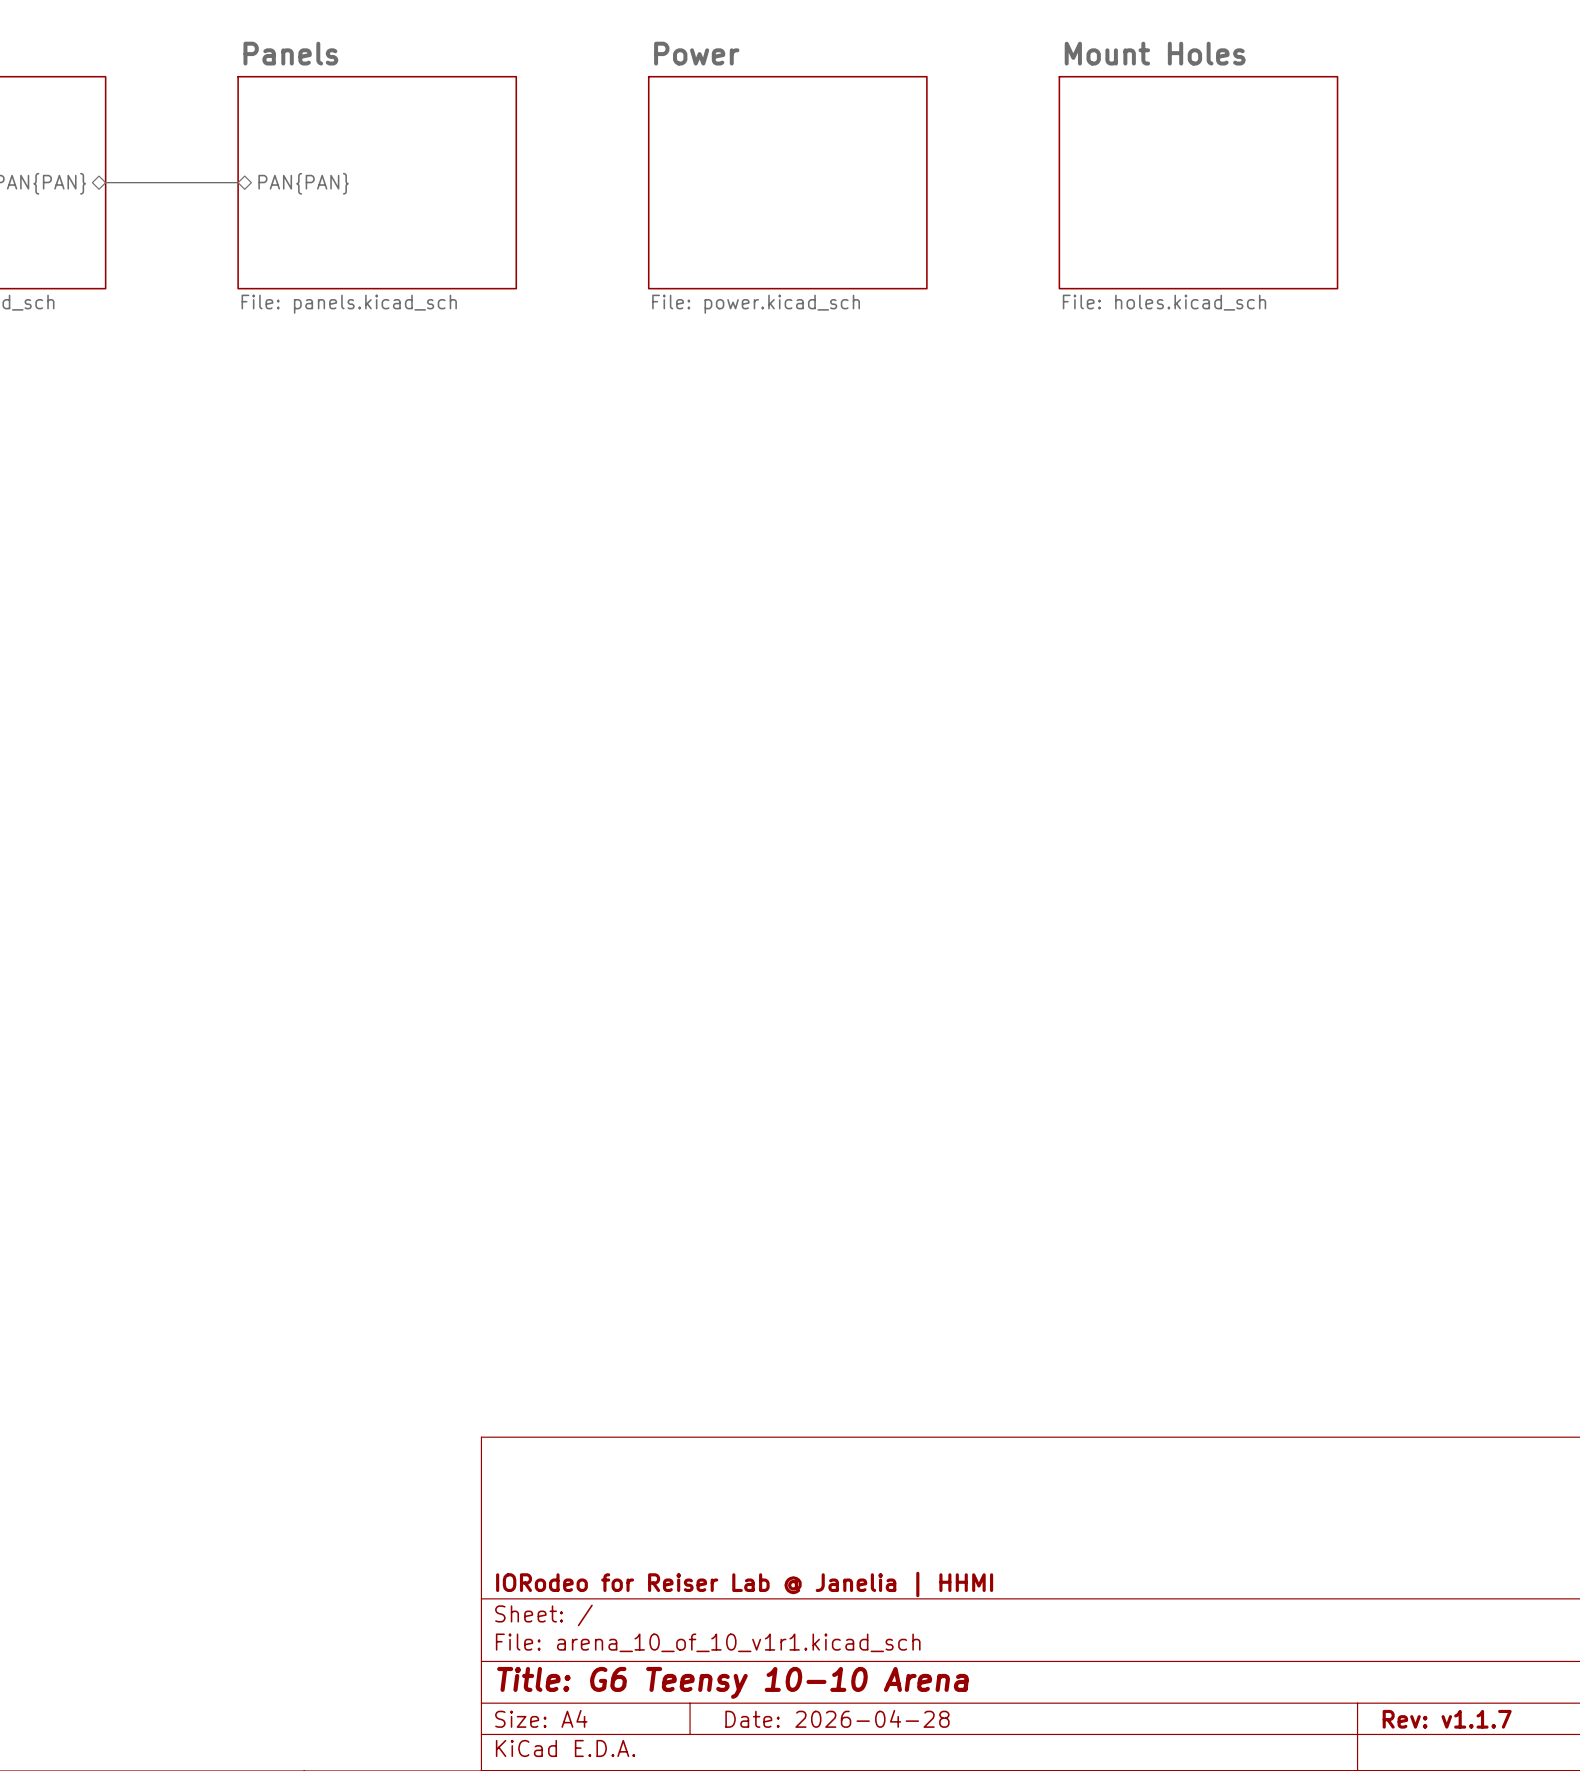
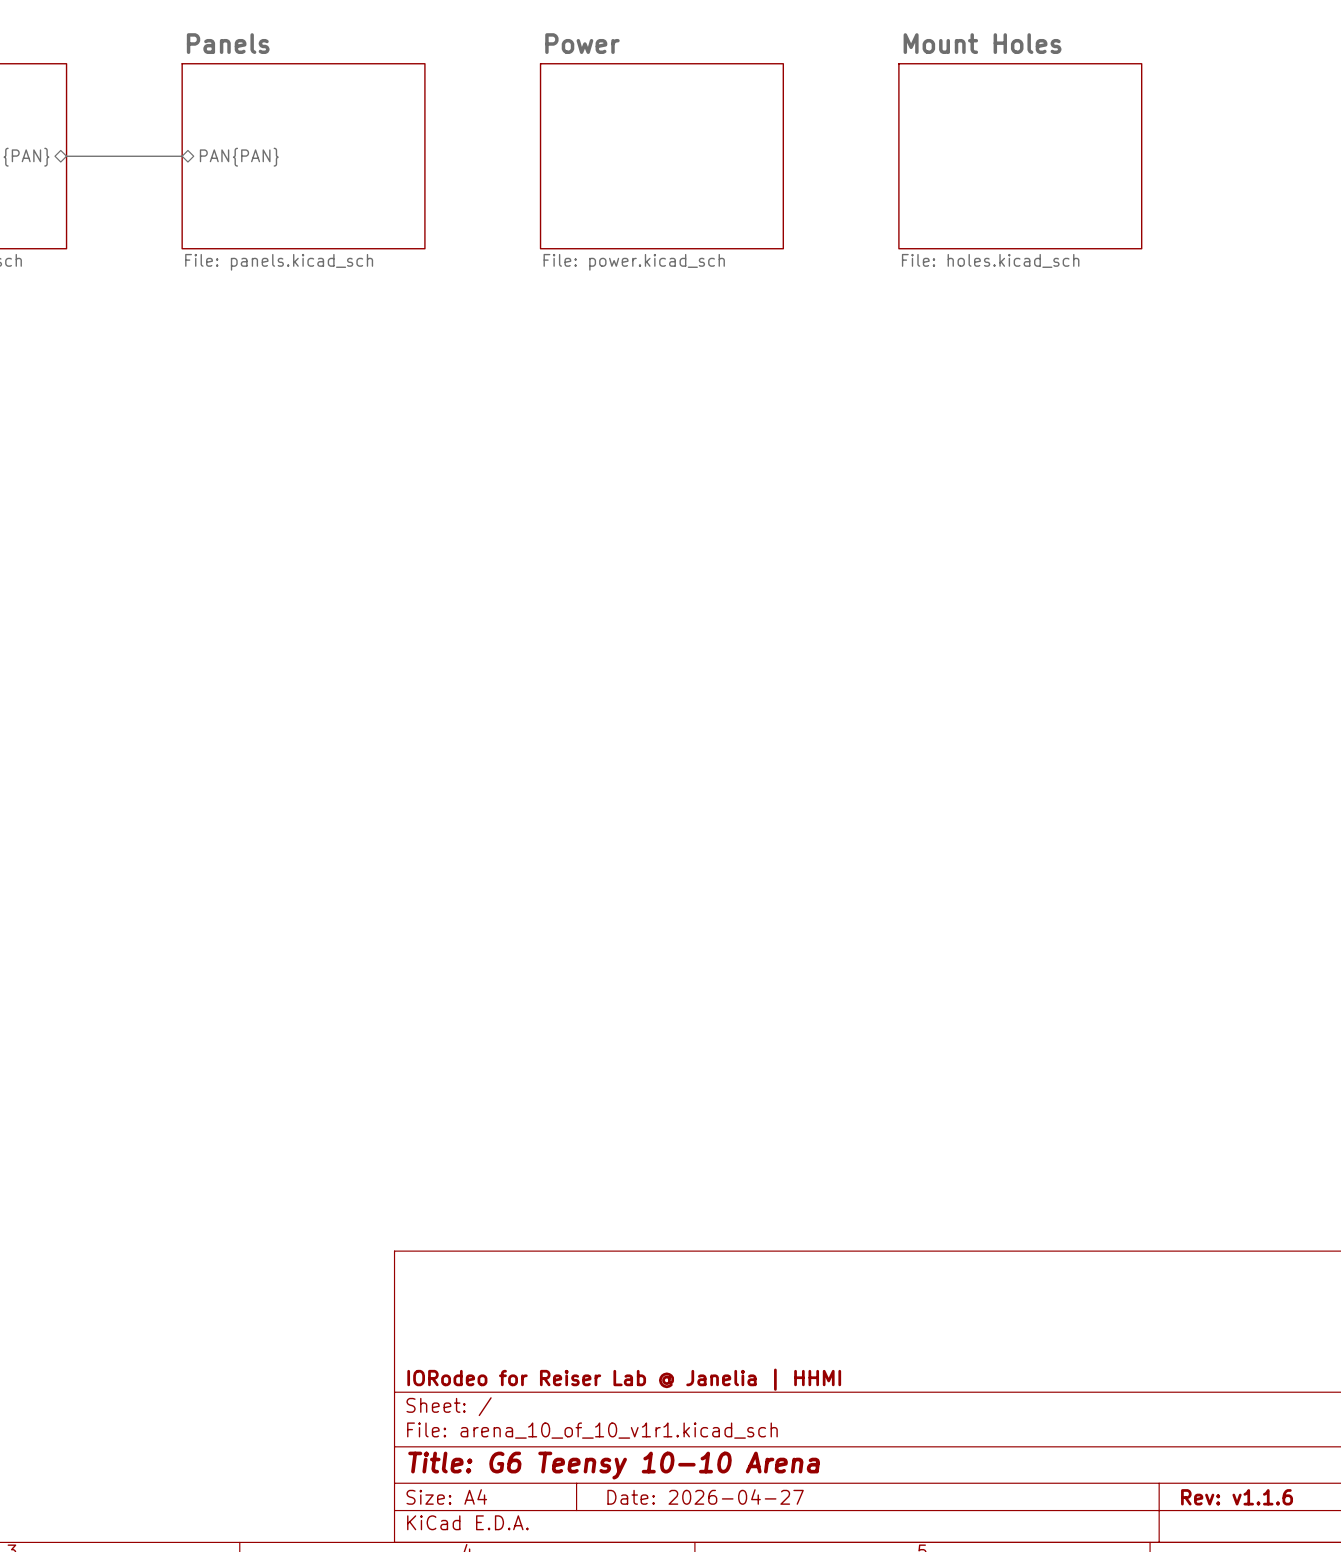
title block: Date: 2026-04-28 (837, 1718) -> Date: 2026-04-27 (705, 1496)
title block: Rev: v1.1.7 (1447, 1719) -> Rev: v1.1.6 (1237, 1497)

